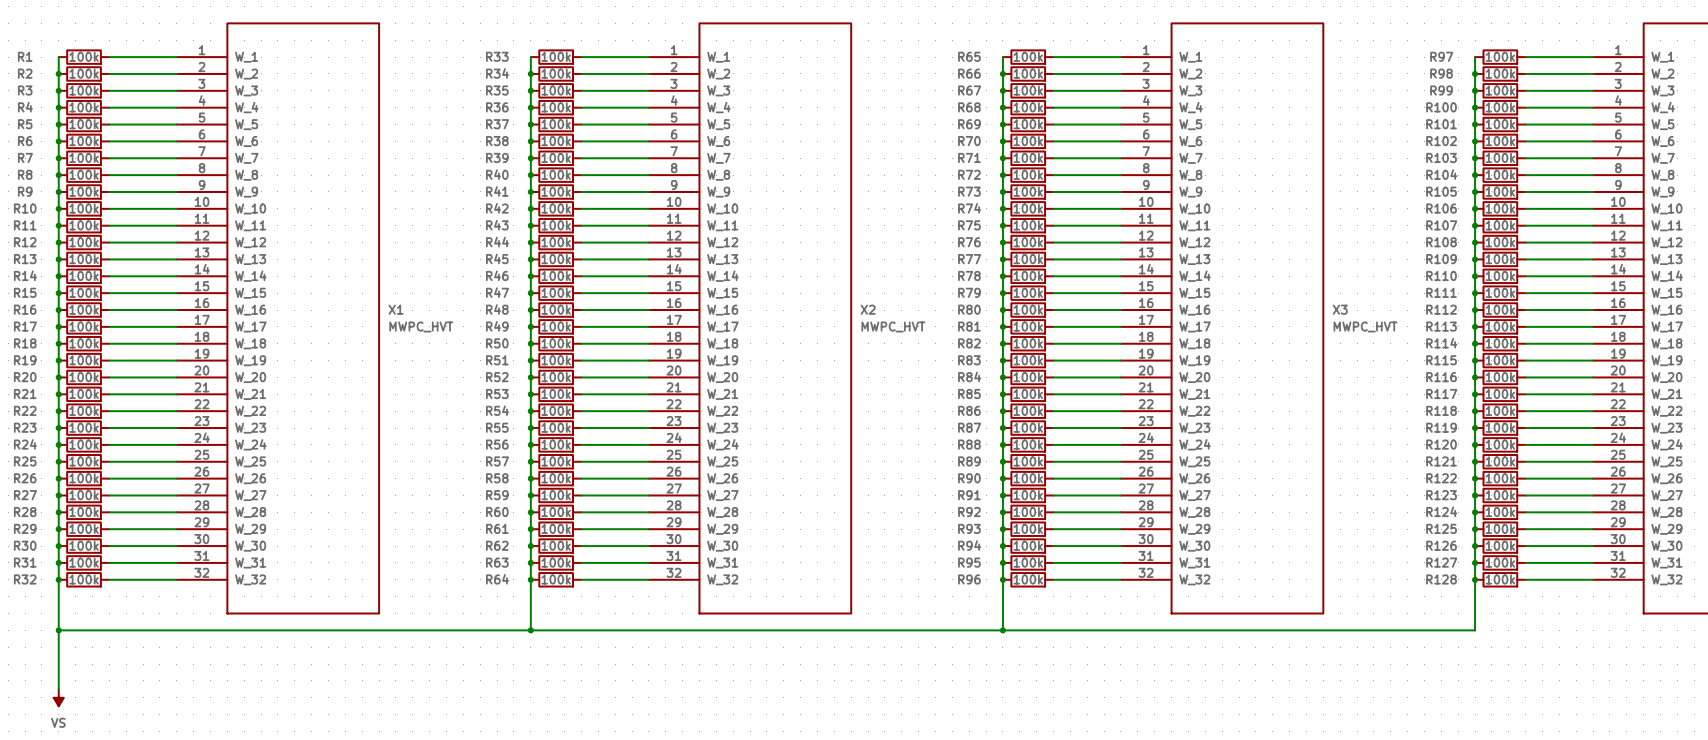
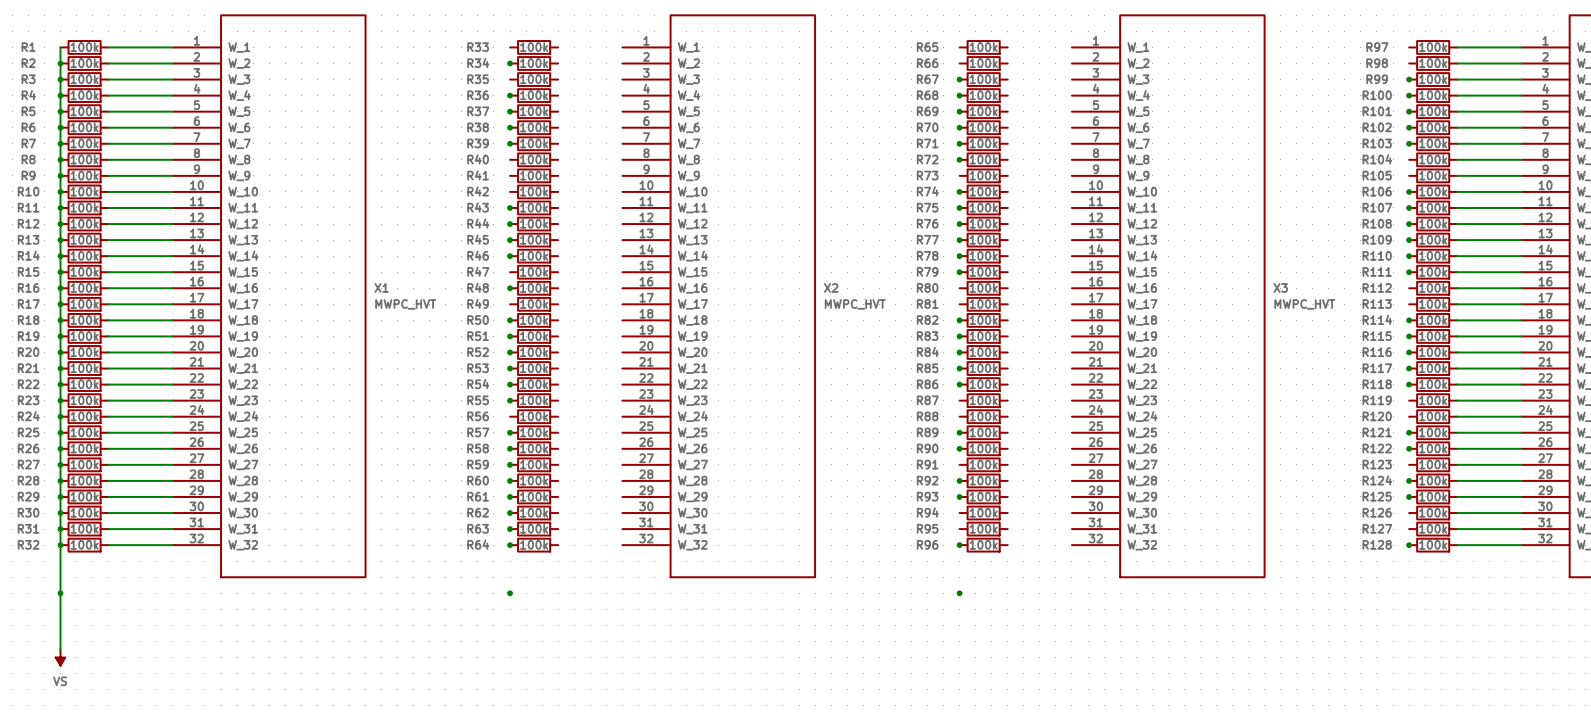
wire: (530, 57) (530, 630) -> none
wire: (581, 57) (648, 57) -> none
wire: (1002, 57) (1002, 630) -> none
wire: (1053, 57) (1120, 57) -> none
wire: (1475, 57) (1475, 630) (58, 630) -> none
wire: (581, 73) (648, 73) -> none
junction: (1002, 73) -> none
wire: (1053, 73) (1120, 73) -> none
junction: (1475, 73) -> none
junction: (530, 90) -> none
wire: (581, 90) (648, 90) -> none
wire: (1053, 90) (1120, 90) -> none
wire: (581, 107) (648, 107) -> none
wire: (1053, 107) (1120, 107) -> none
wire: (581, 124) (648, 124) -> none
wire: (1053, 124) (1120, 124) -> none
wire: (581, 141) (648, 141) -> none
wire: (1053, 141) (1120, 141) -> none
wire: (581, 158) (648, 158) -> none
wire: (1053, 158) (1120, 158) -> none
junction: (530, 175) -> none
wire: (581, 175) (648, 175) -> none
wire: (1053, 175) (1120, 175) -> none
junction: (1475, 175) -> none
junction: (530, 191) -> none
wire: (581, 191) (648, 191) -> none
junction: (1002, 191) -> none
wire: (1053, 191) (1120, 191) -> none
junction: (1475, 191) -> none
junction: (530, 208) -> none
wire: (581, 208) (648, 208) -> none
wire: (1053, 208) (1120, 208) -> none
wire: (581, 225) (648, 225) -> none
wire: (1053, 225) (1120, 225) -> none
wire: (581, 242) (648, 242) -> none
wire: (1053, 242) (1120, 242) -> none
wire: (581, 259) (648, 259) -> none
wire: (1053, 259) (1120, 259) -> none
wire: (581, 276) (648, 276) -> none
wire: (1053, 276) (1120, 276) -> none
junction: (530, 293) -> none
wire: (581, 293) (648, 293) -> none
wire: (1053, 293) (1120, 293) -> none
wire: (581, 310) (648, 310) -> none
junction: (1002, 310) -> none
wire: (1053, 310) (1120, 310) -> none
junction: (1475, 310) -> none
junction: (530, 326) -> none
wire: (581, 326) (648, 326) -> none
junction: (1002, 326) -> none
wire: (1053, 326) (1120, 326) -> none
junction: (1475, 326) -> none
wire: (581, 343) (648, 343) -> none
wire: (1053, 343) (1120, 343) -> none
wire: (581, 360) (648, 360) -> none
wire: (1053, 360) (1120, 360) -> none
wire: (581, 377) (648, 377) -> none
wire: (1053, 377) (1120, 377) -> none
wire: (581, 394) (648, 394) -> none
wire: (1053, 394) (1120, 394) -> none
wire: (581, 411) (648, 411) -> none
wire: (1053, 411) (1120, 411) -> none
wire: (581, 428) (648, 428) -> none
junction: (1002, 428) -> none
wire: (1053, 428) (1120, 428) -> none
junction: (1475, 428) -> none
junction: (530, 444) -> none
wire: (581, 444) (648, 444) -> none
junction: (1002, 444) -> none
wire: (1053, 444) (1120, 444) -> none
junction: (1475, 444) -> none
wire: (581, 461) (648, 461) -> none
wire: (1053, 461) (1120, 461) -> none
wire: (581, 478) (648, 478) -> none
wire: (1053, 478) (1120, 478) -> none
wire: (581, 495) (648, 495) -> none
junction: (1002, 495) -> none
wire: (1053, 495) (1120, 495) -> none
junction: (1475, 495) -> none
wire: (581, 512) (648, 512) -> none
wire: (1053, 512) (1120, 512) -> none
wire: (581, 529) (648, 529) -> none
wire: (1053, 529) (1120, 529) -> none
wire: (581, 546) (648, 546) -> none
junction: (1002, 546) -> none
wire: (1053, 546) (1120, 546) -> none
junction: (1475, 546) -> none
wire: (581, 562) (648, 562) -> none
junction: (1002, 562) -> none
wire: (1053, 562) (1120, 562) -> none
junction: (1475, 562) -> none
wire: (581, 579) (648, 579) -> none
wire: (1053, 579) (1120, 579) -> none

